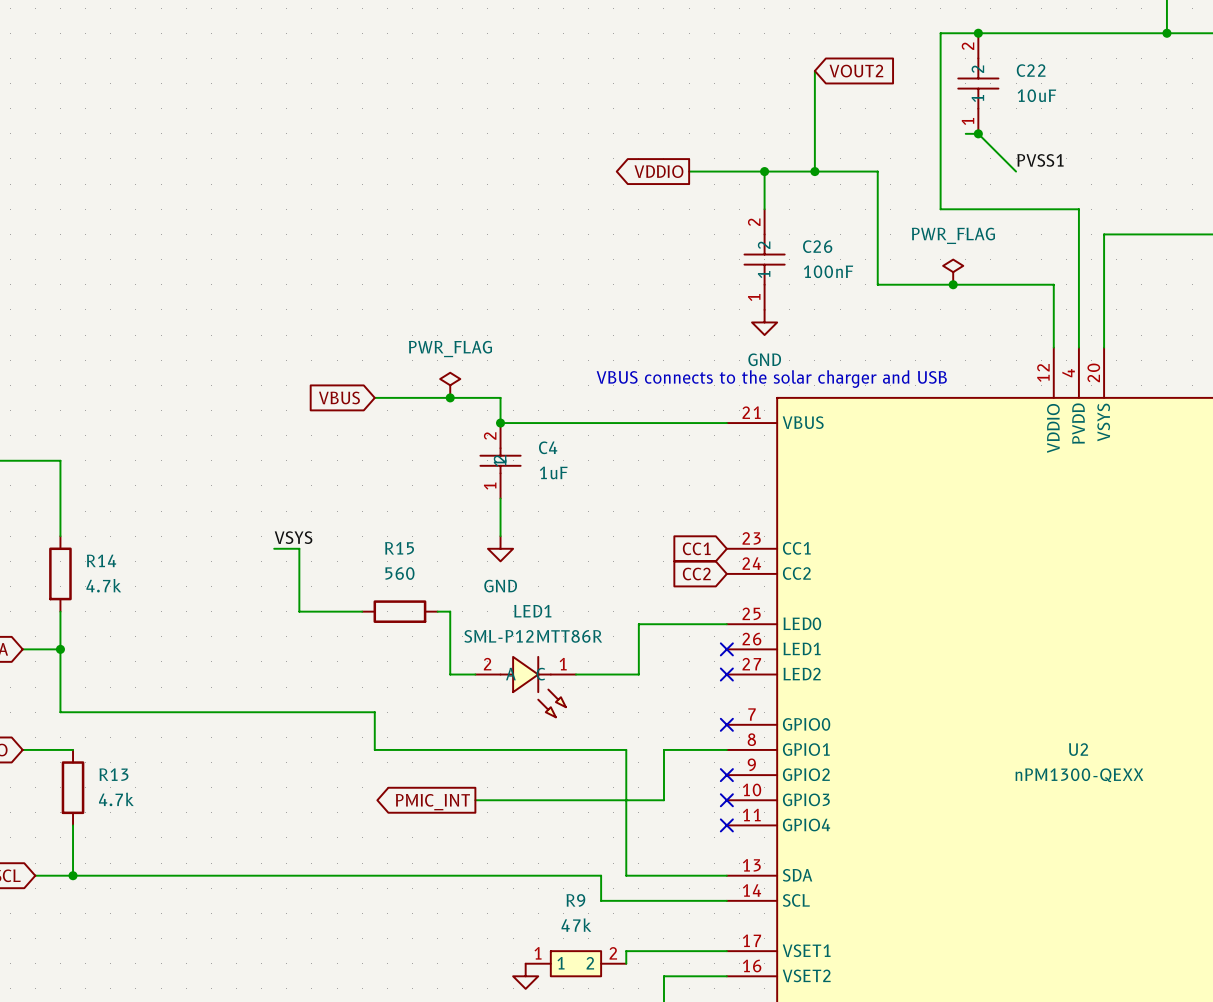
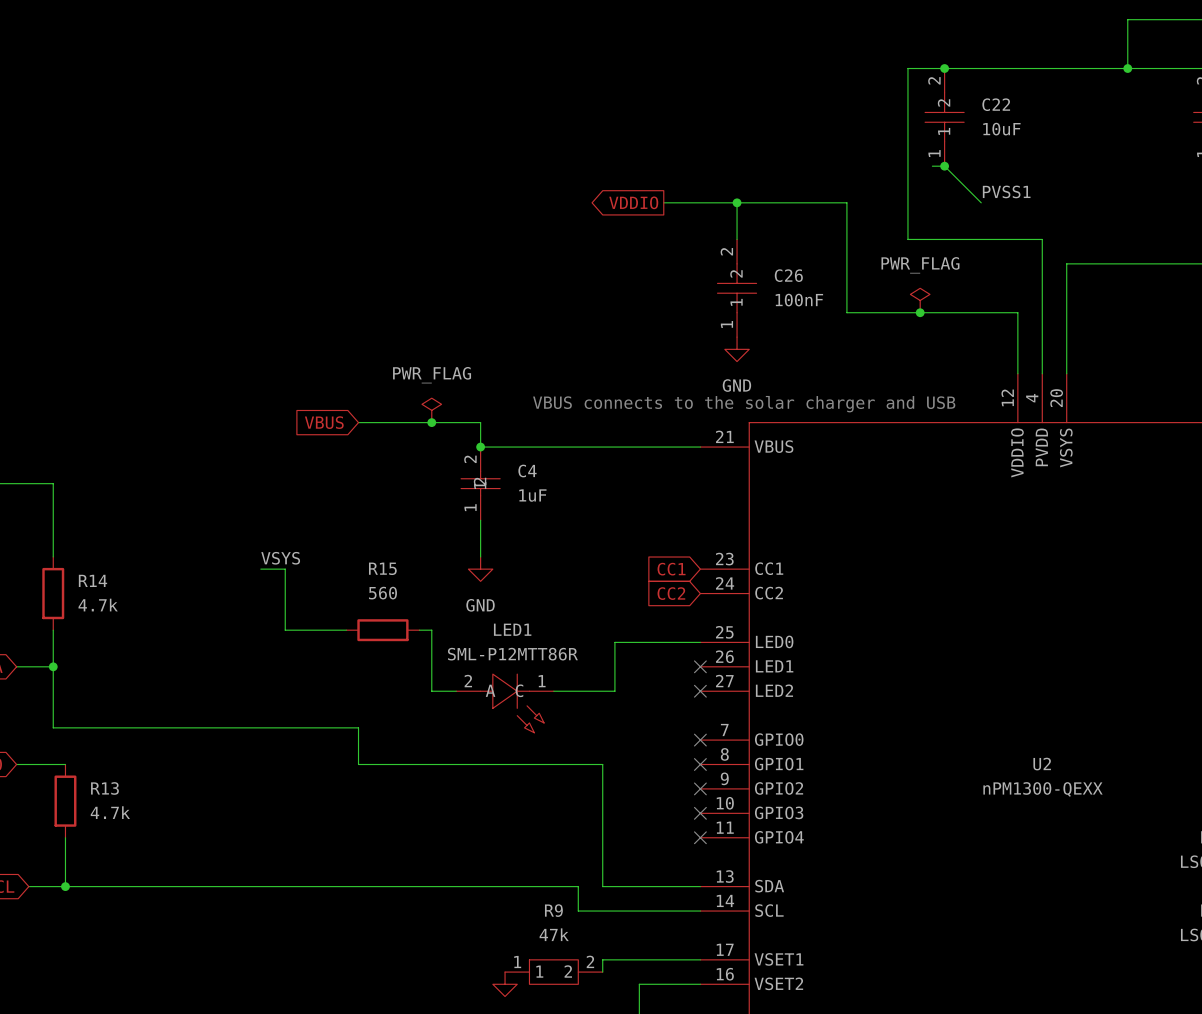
wire: (814, 70) (814, 171) -> none
global label: VOUT2 (856, 71) -> none
junction: (814, 171) -> none
wire: (726, 749) (663, 749) (663, 800) (475, 800) -> none
no-connect mark: none -> (700, 764)
global label: PMIC_INT (432, 802) -> none

